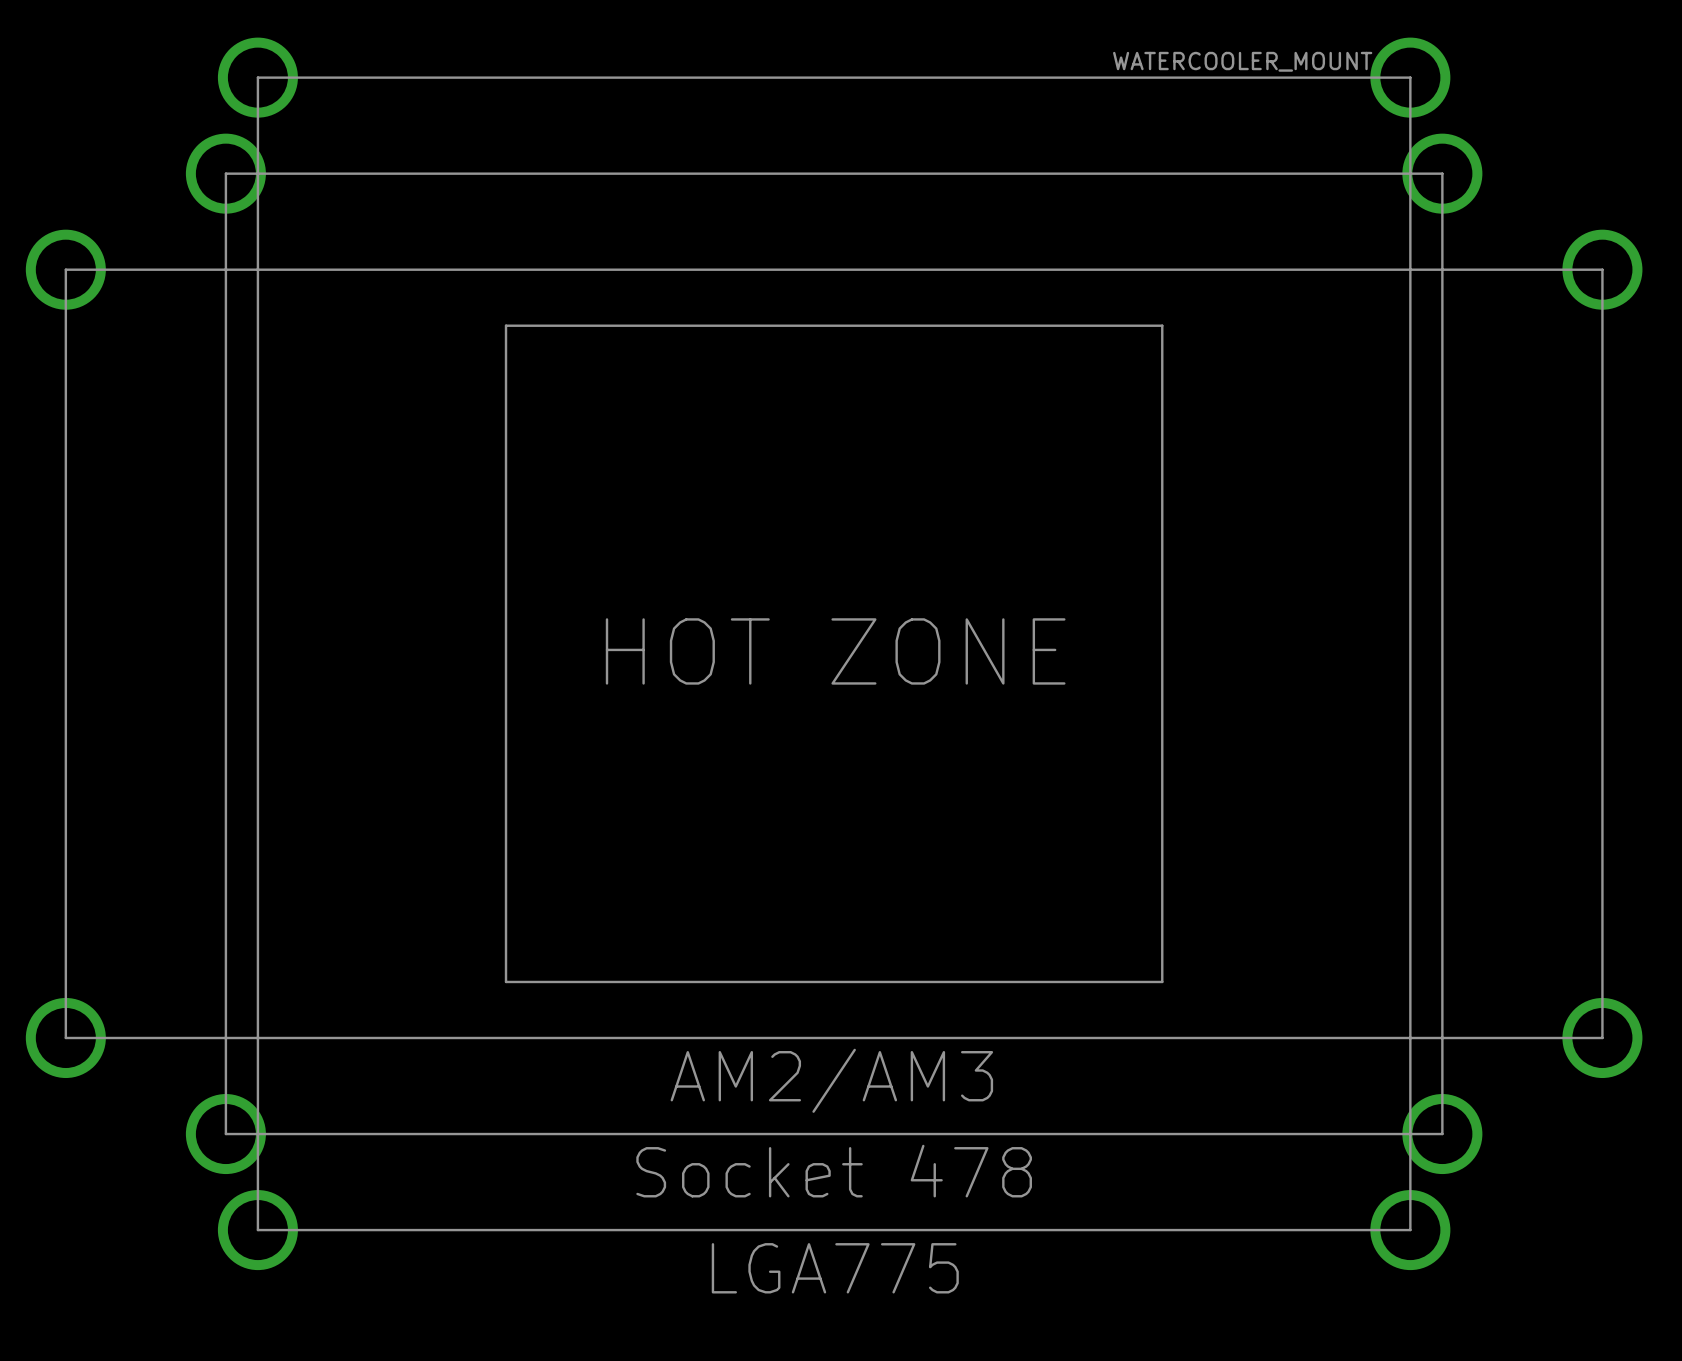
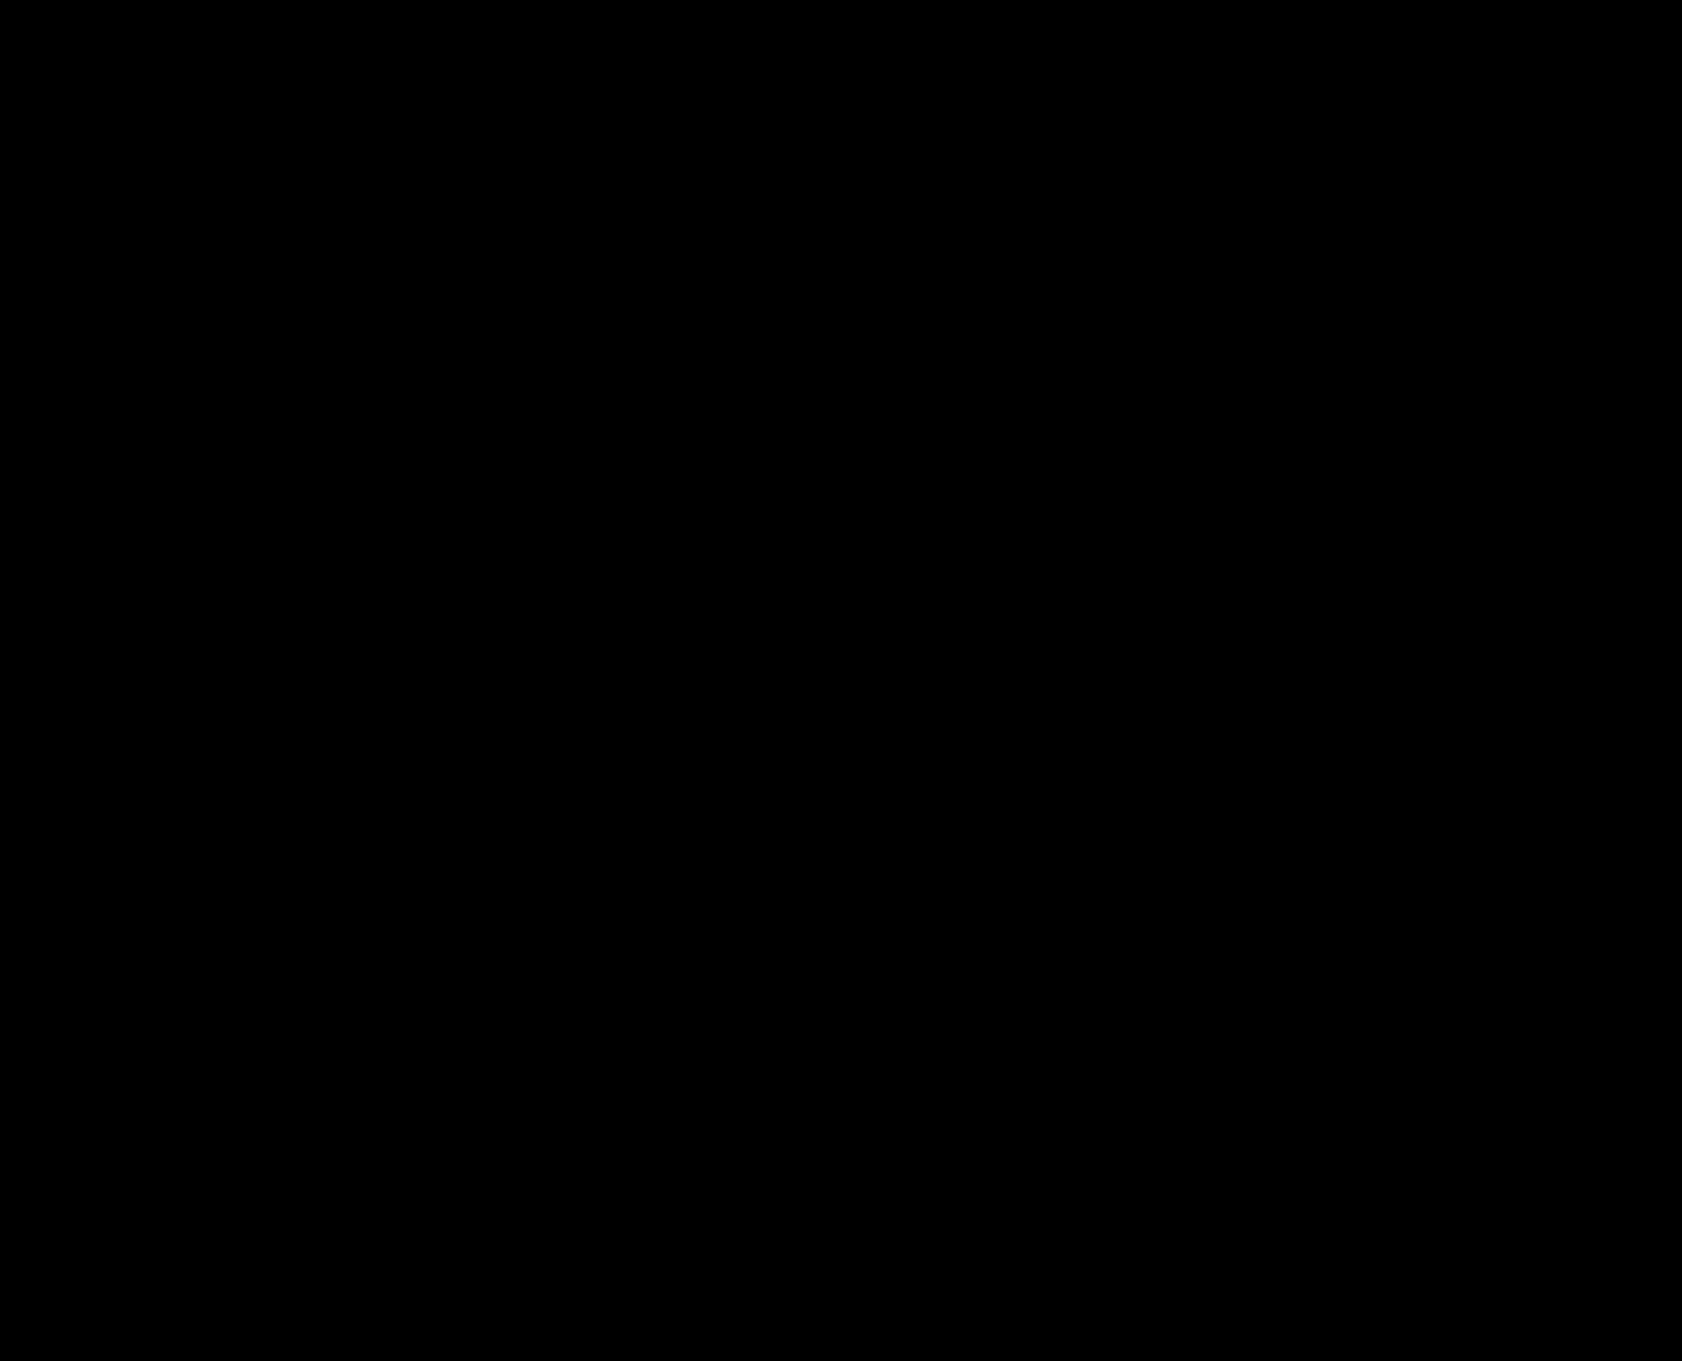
part: WATERCOOLER_MOUNT (834, 653) -> none

